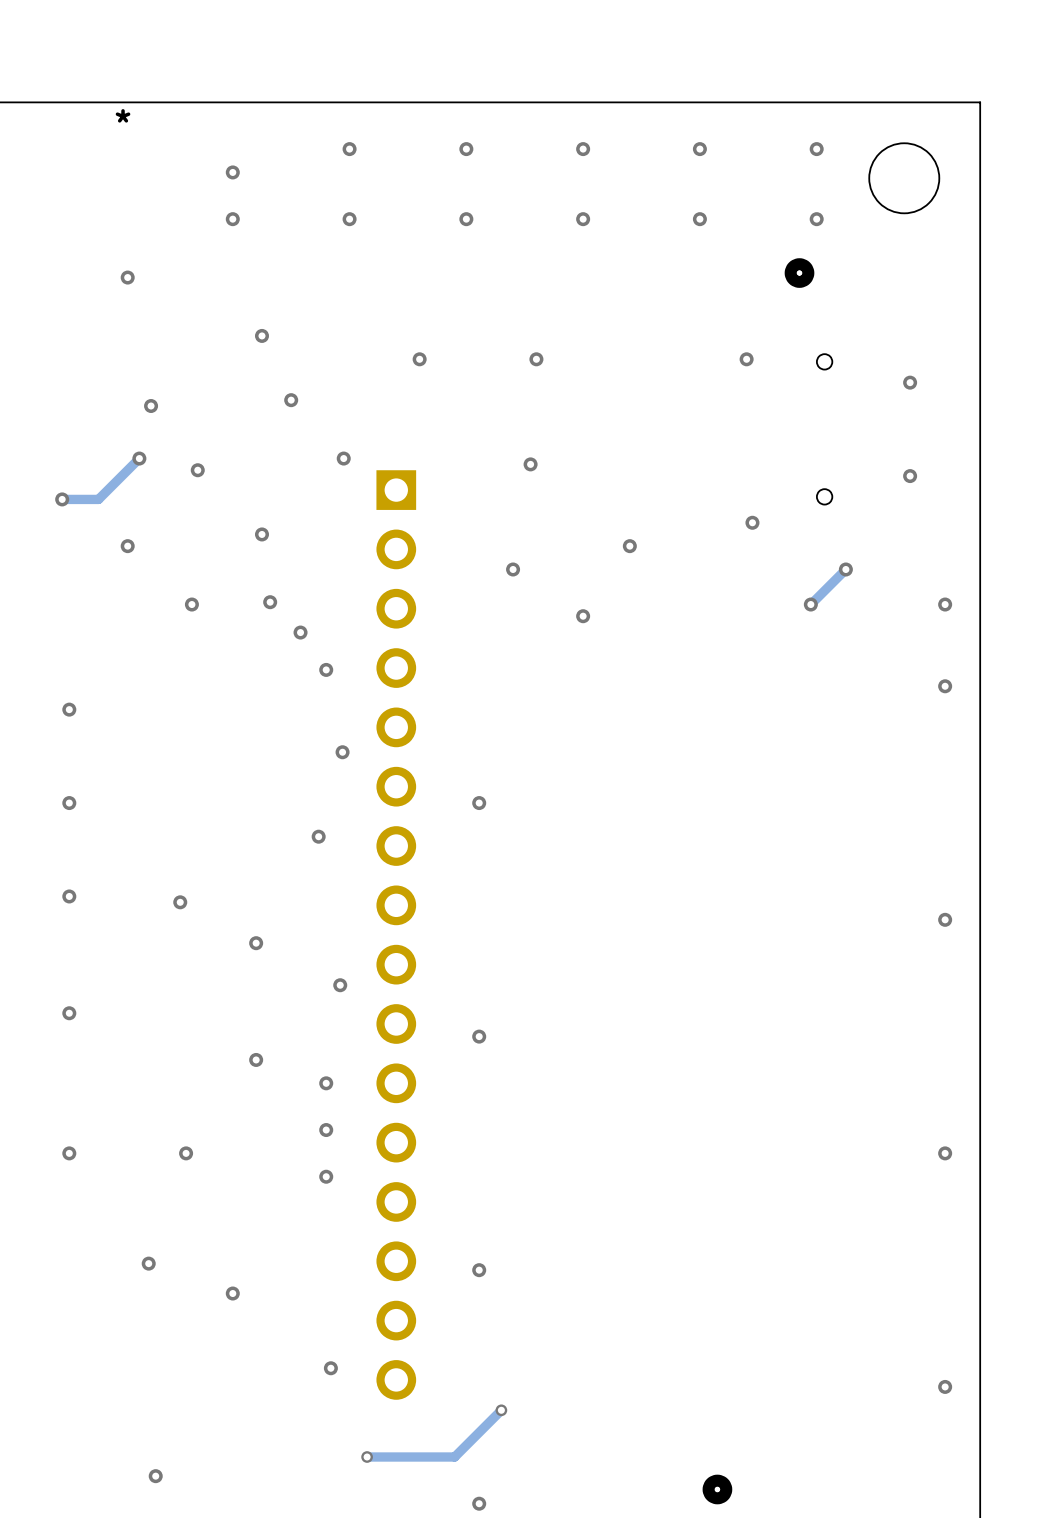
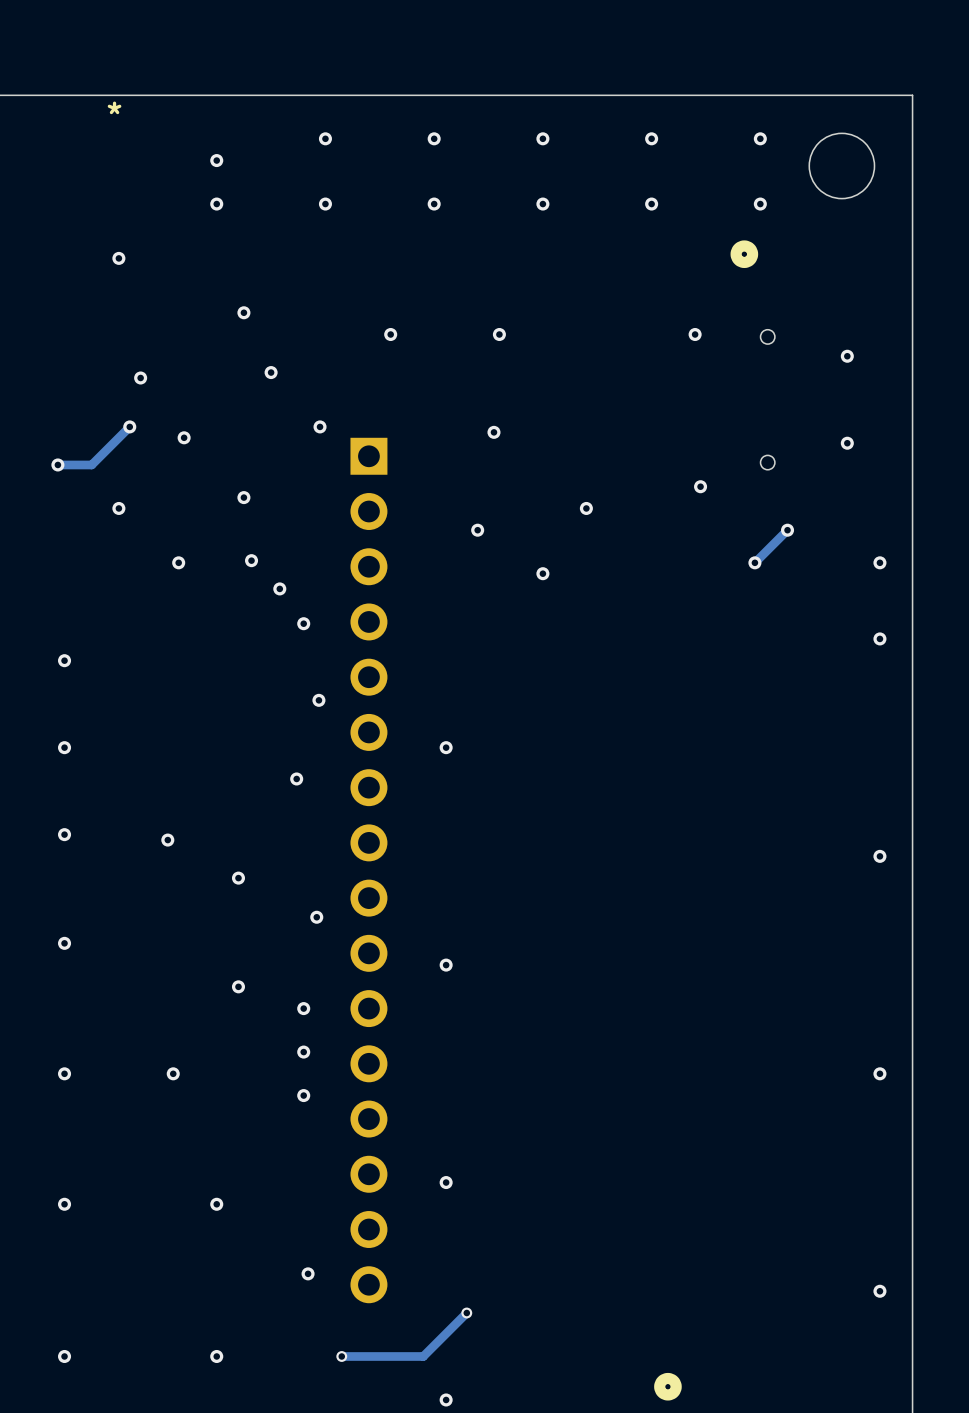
via position: (148, 1263) -> (64, 1204)
via: none -> (64, 1356)
via: none -> (216, 1356)
via: (155, 1476) -> none

